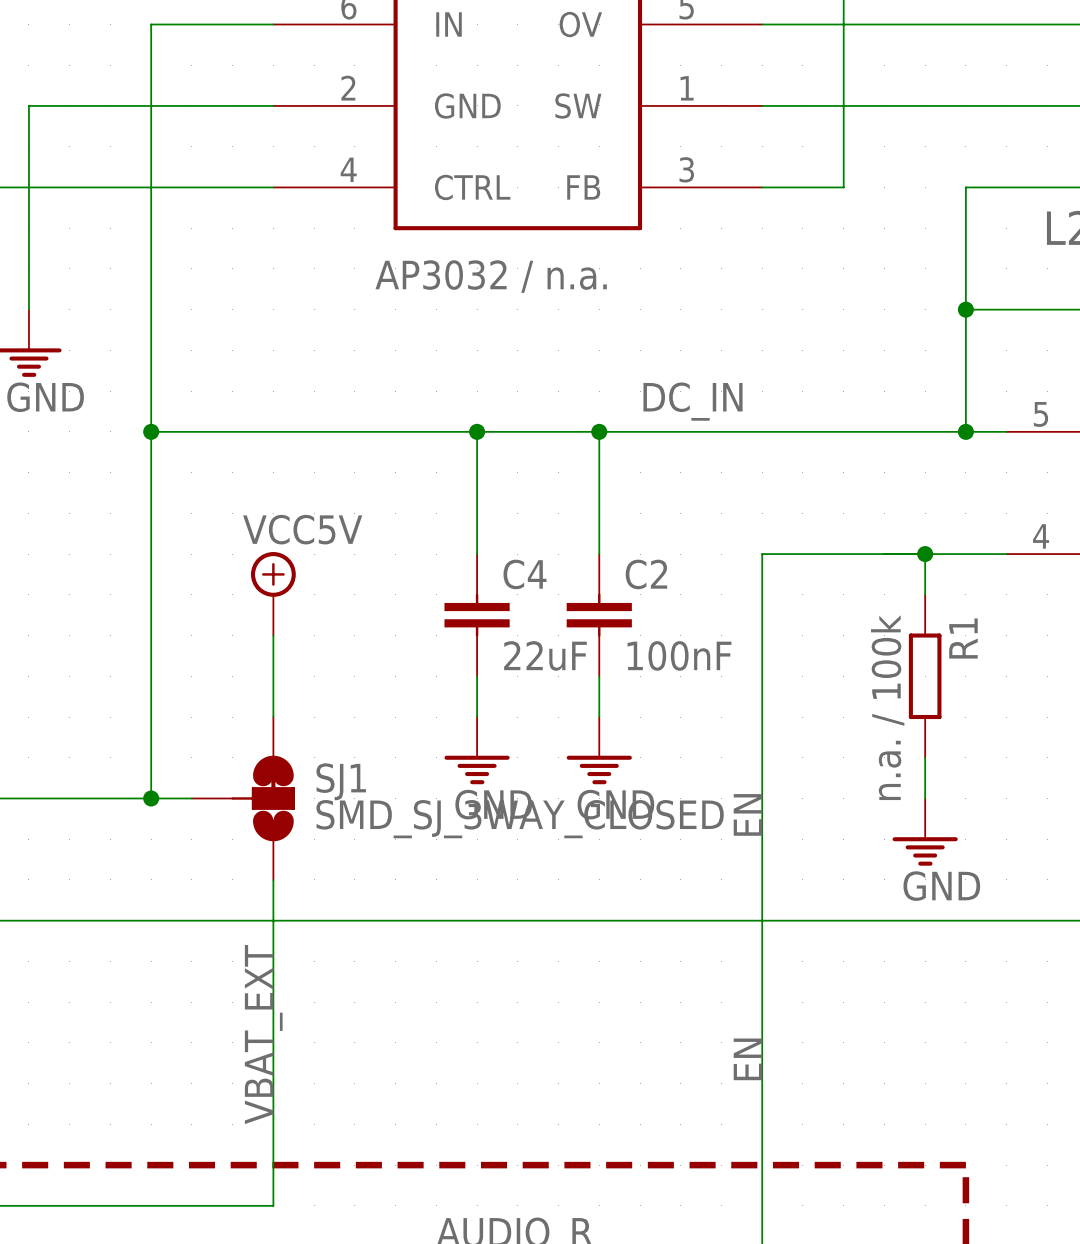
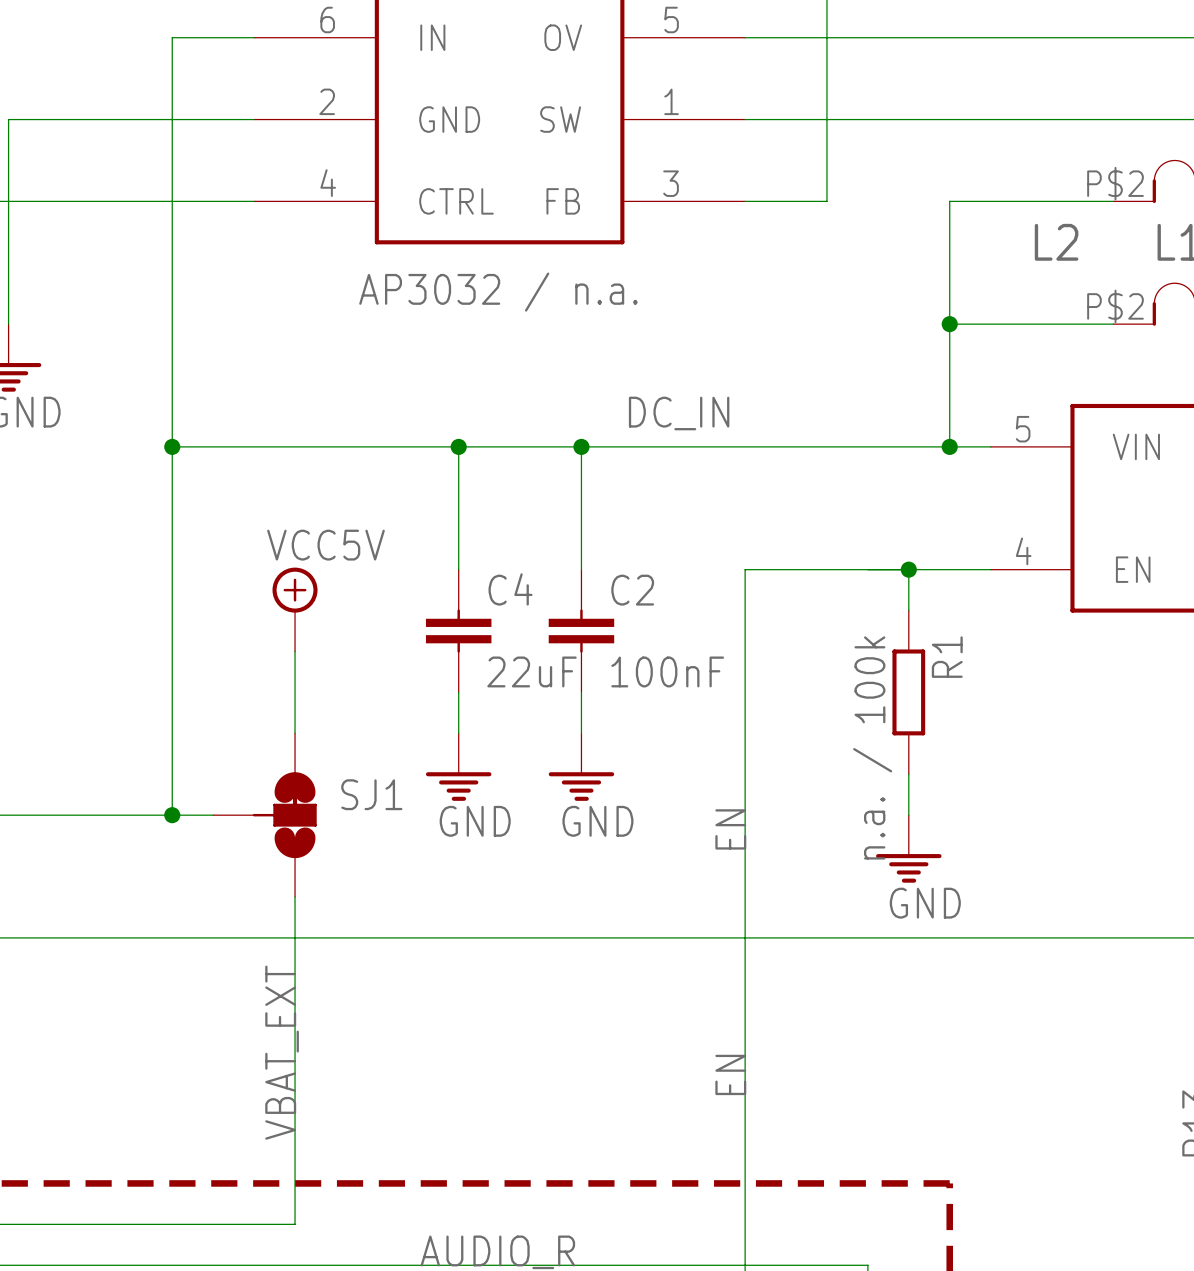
wire: (191, 24) (151, 24) (151, 798) -> (172, 37) (172, 815) (213, 815)
wire: (151, 431) (191, 431) -> none
junction position: (151, 431) -> (172, 446)
power symbol position: VCC5V (273, 593) -> VCC5V (295, 609)
wire: (273, 635) (273, 717) -> (295, 651) (295, 733)
junction position: (151, 798) -> (172, 815)
SJ1 position: (243, 798) -> (264, 815)
SJ1 value: SMD_SJ_3WAY_CLOSED (520, 819) -> none
wire: (273, 879) (273, 1205) -> (295, 897) (295, 1224) (254, 1224)
label position: VBAT_EXT (263, 1034) -> VBAT_EXT (282, 1052)

